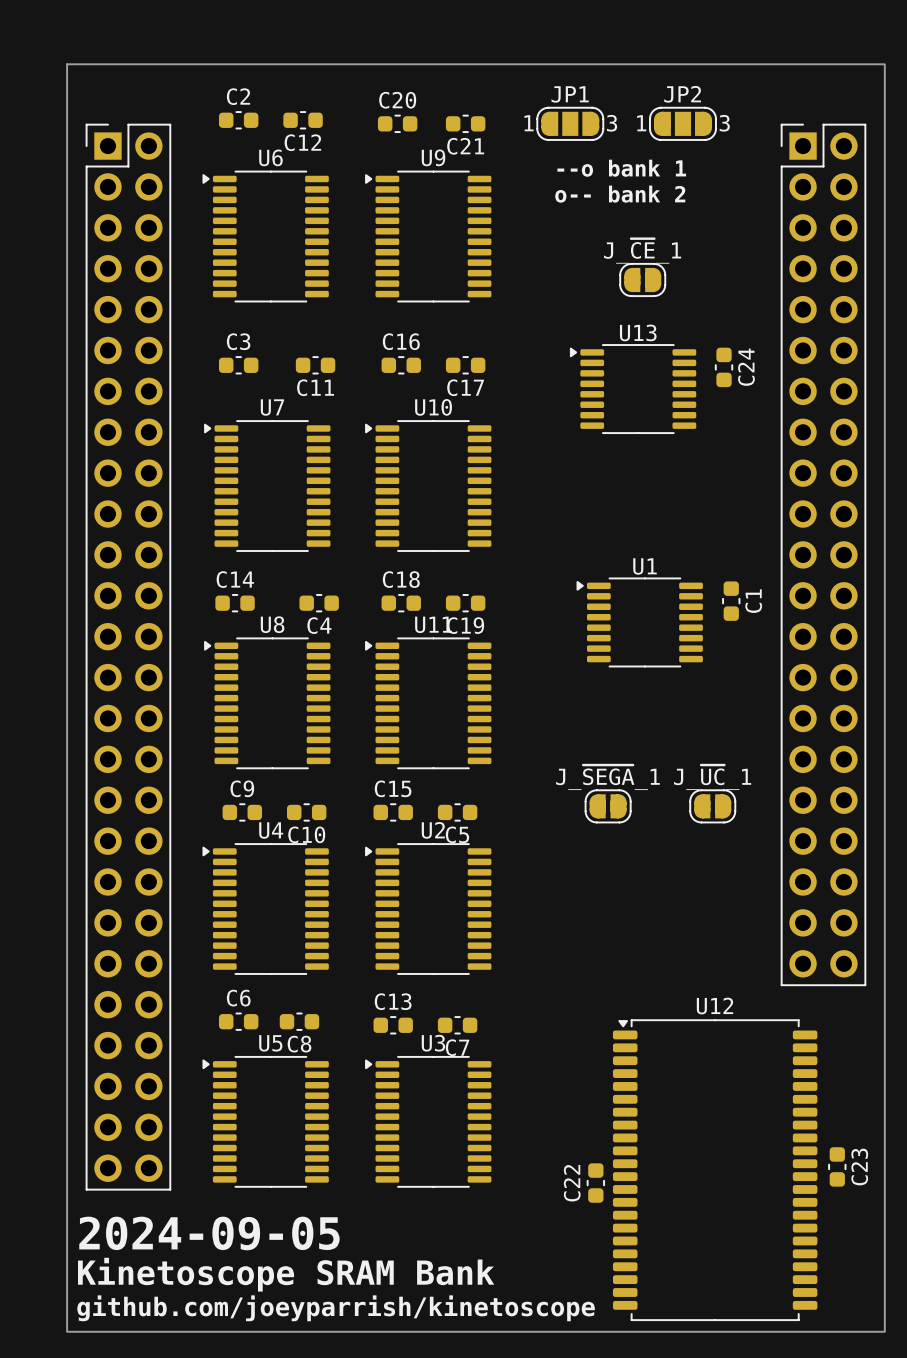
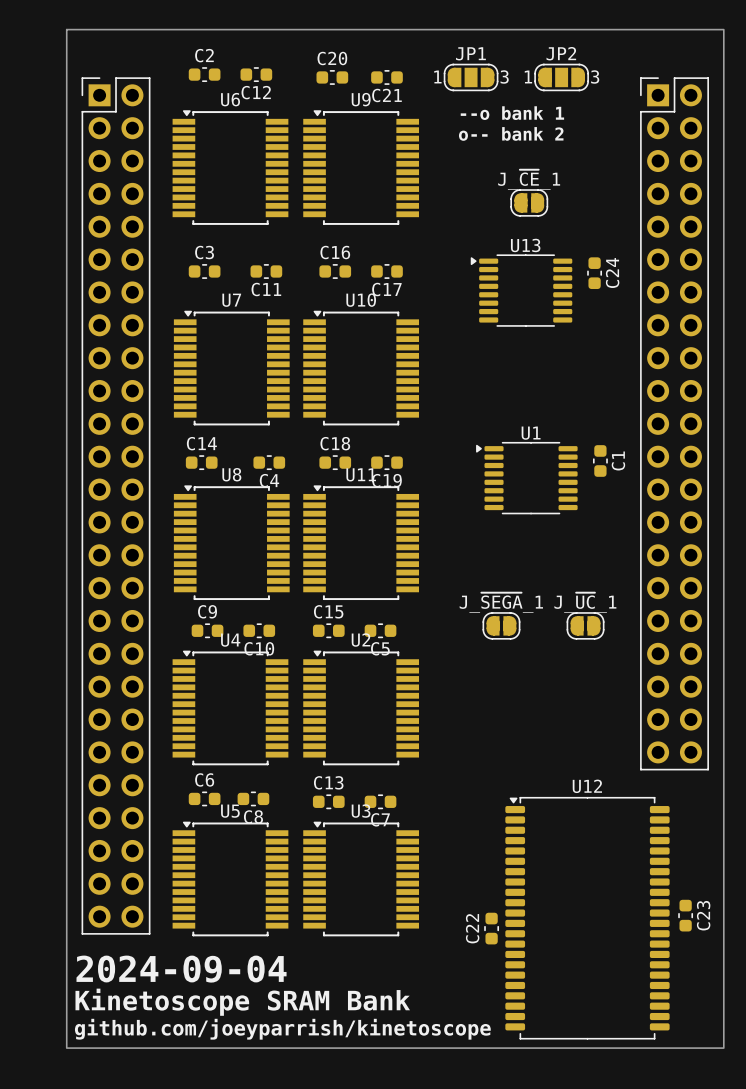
U6 footprint: [202, 170, 329, 303] -> [172, 110, 289, 225]
U9 footprint: [365, 170, 492, 303] -> [303, 110, 420, 225]
U7 footprint: [204, 420, 331, 552] -> [173, 310, 290, 426]
U10 footprint: [365, 420, 492, 552] -> [303, 310, 420, 426]
U8 footprint: [204, 637, 331, 770] -> [173, 485, 290, 601]
U11 footprint: [365, 637, 492, 770] -> [303, 485, 420, 601]
U4 footprint: [202, 843, 329, 975] -> [172, 650, 289, 766]
U2 footprint: [365, 843, 492, 975] -> [303, 650, 420, 766]
U5 footprint: [202, 1055, 329, 1188] -> [172, 821, 289, 937]
U3 footprint: [365, 1055, 492, 1188] -> [303, 821, 420, 937]
text: 2024-09-05 (209, 1233) -> 2024-09-04 (181, 969)

